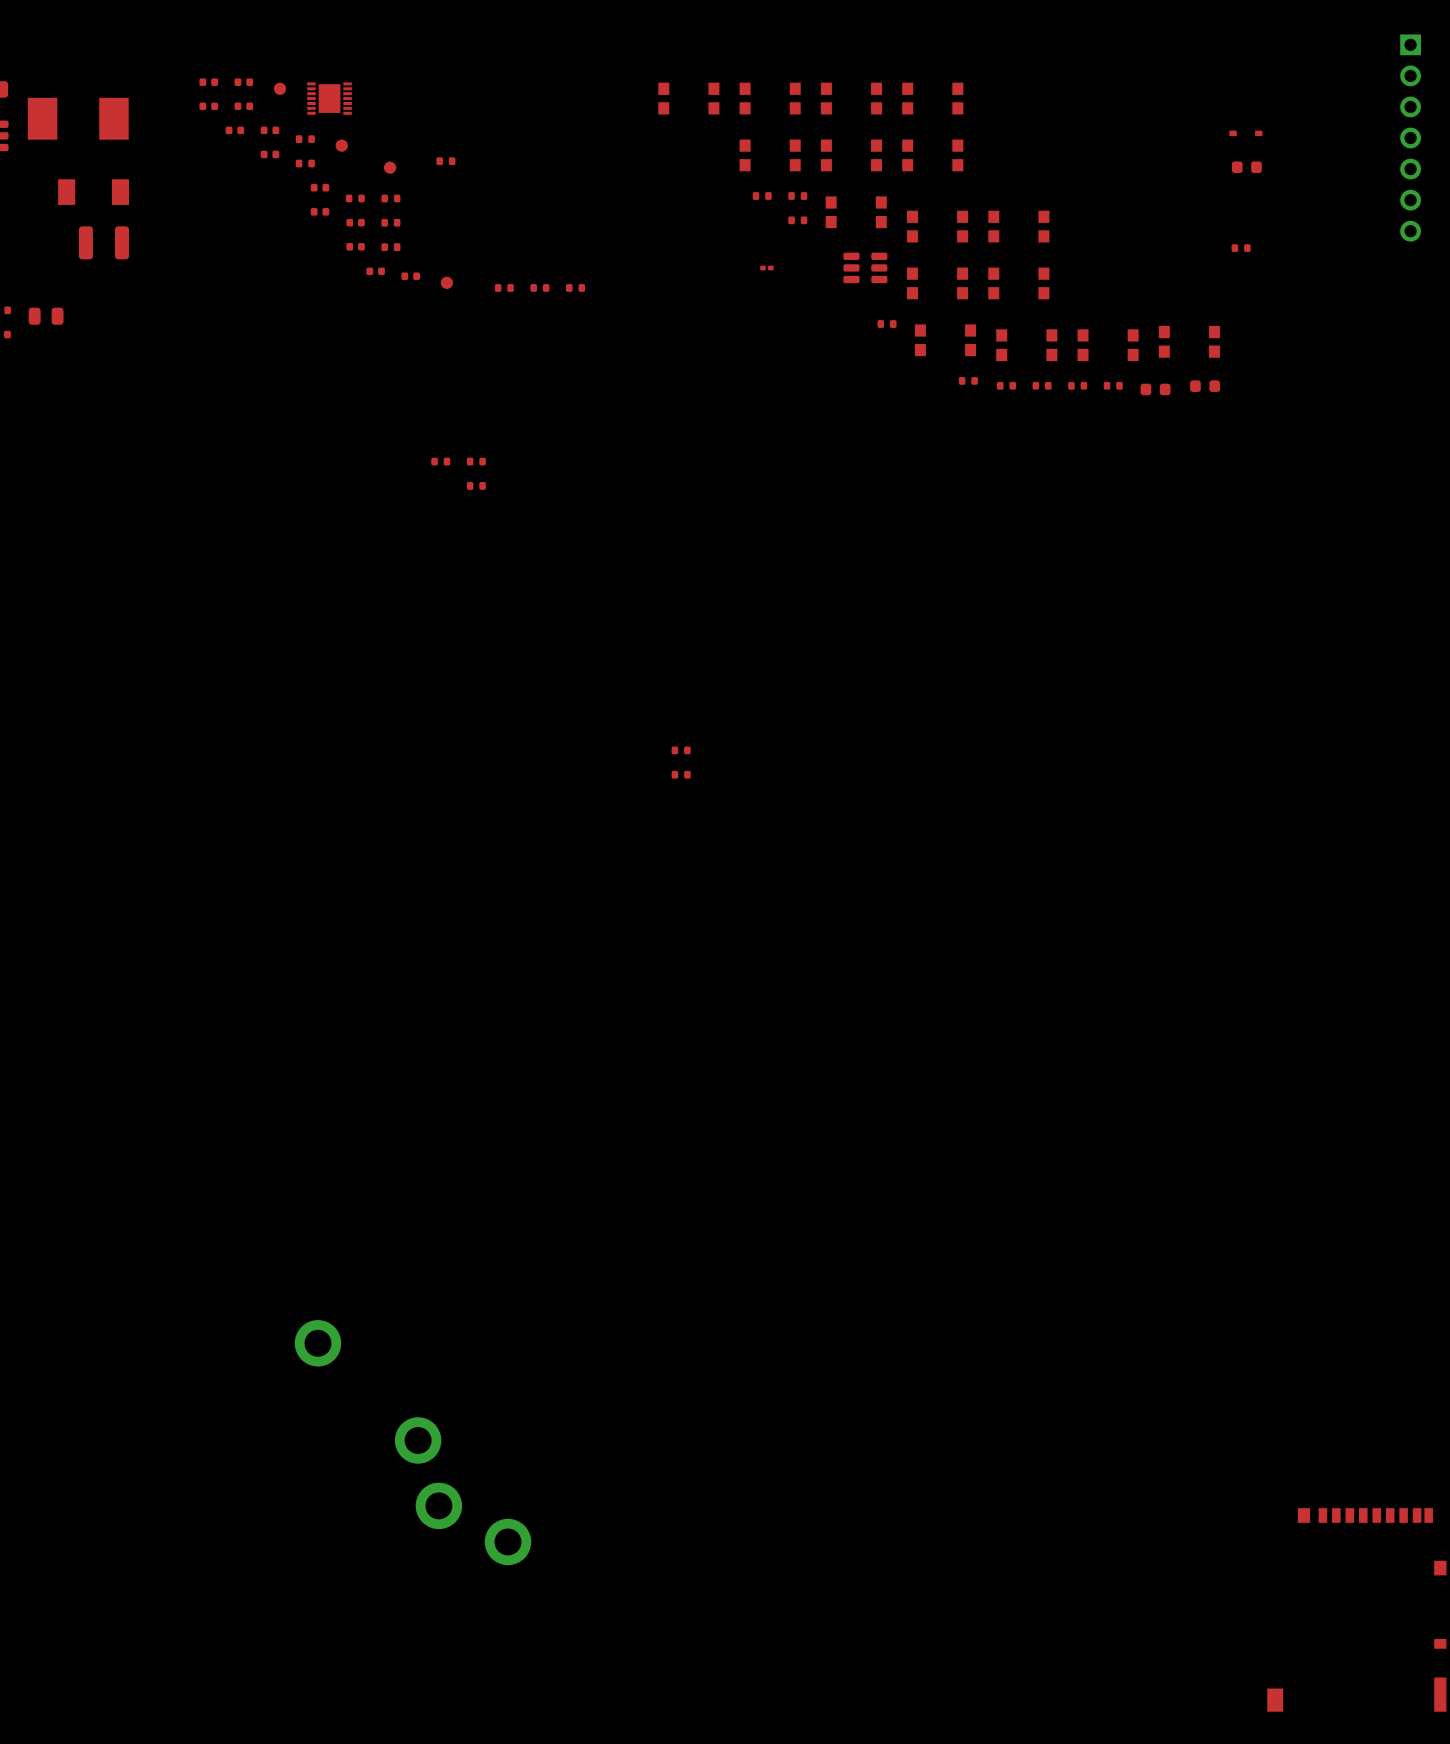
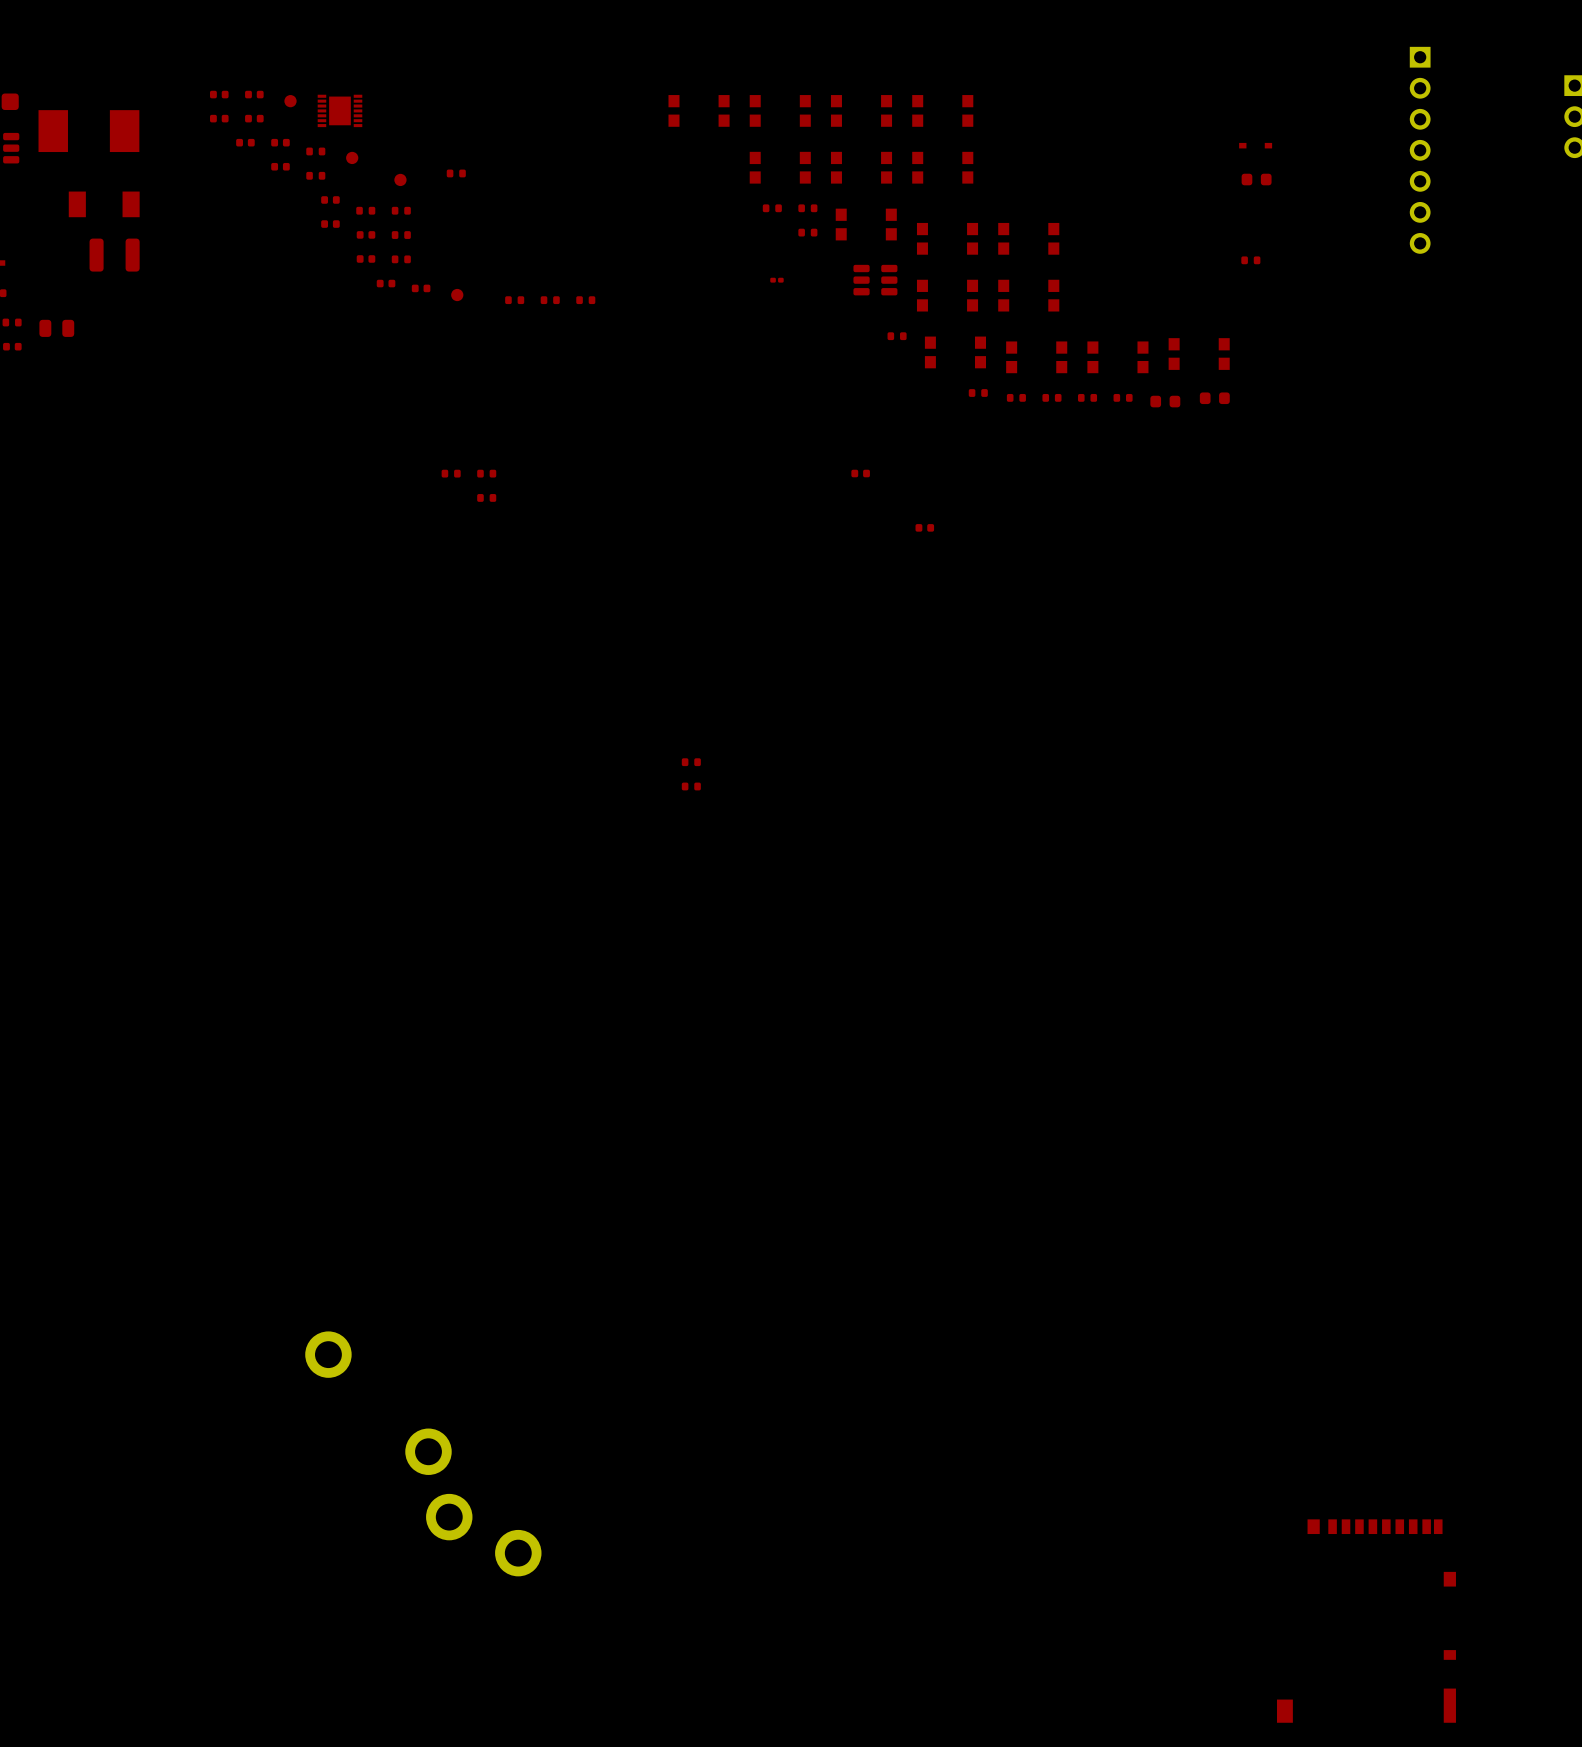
part: none -> (860, 473)
part: none -> (924, 527)

